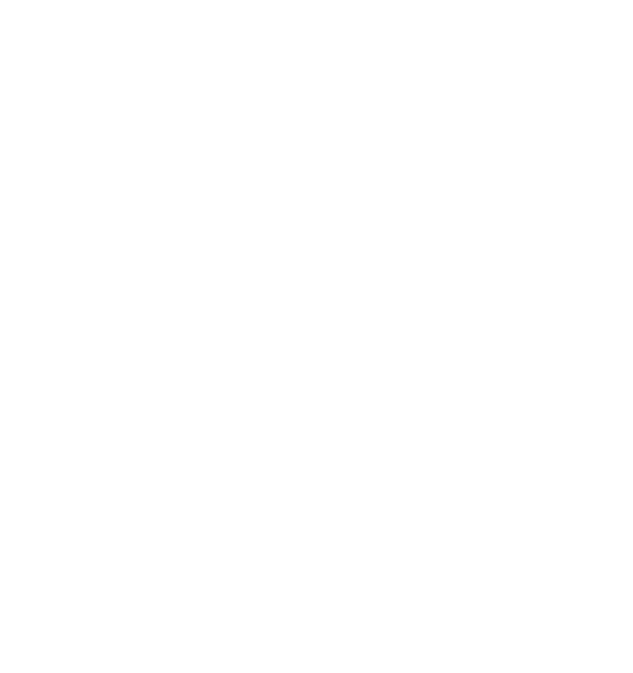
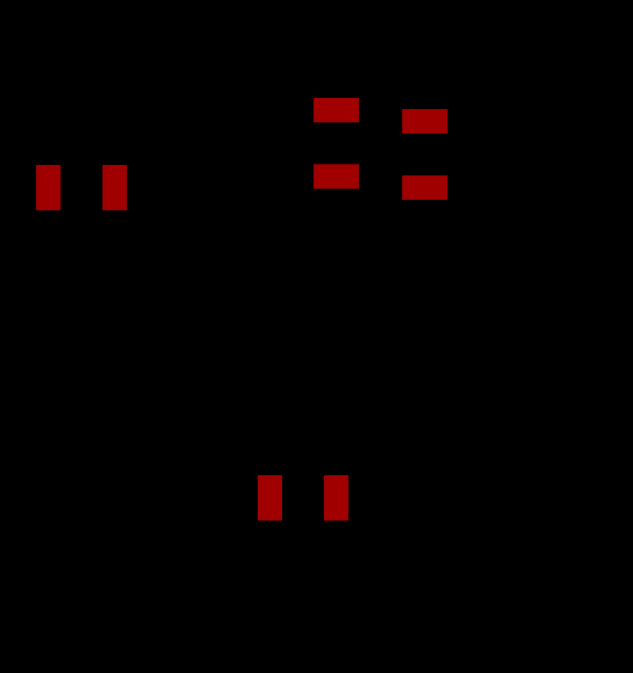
part: none -> (336, 143)
part: none -> (424, 154)
part: none -> (81, 187)
part: none -> (303, 497)

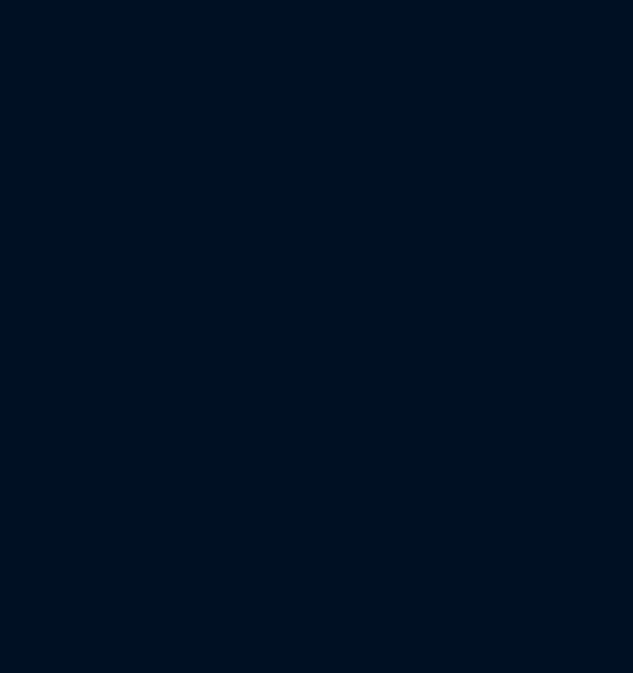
part: (336, 143) -> none
part: (424, 154) -> none
part: (81, 187) -> none
part: (303, 497) -> none

